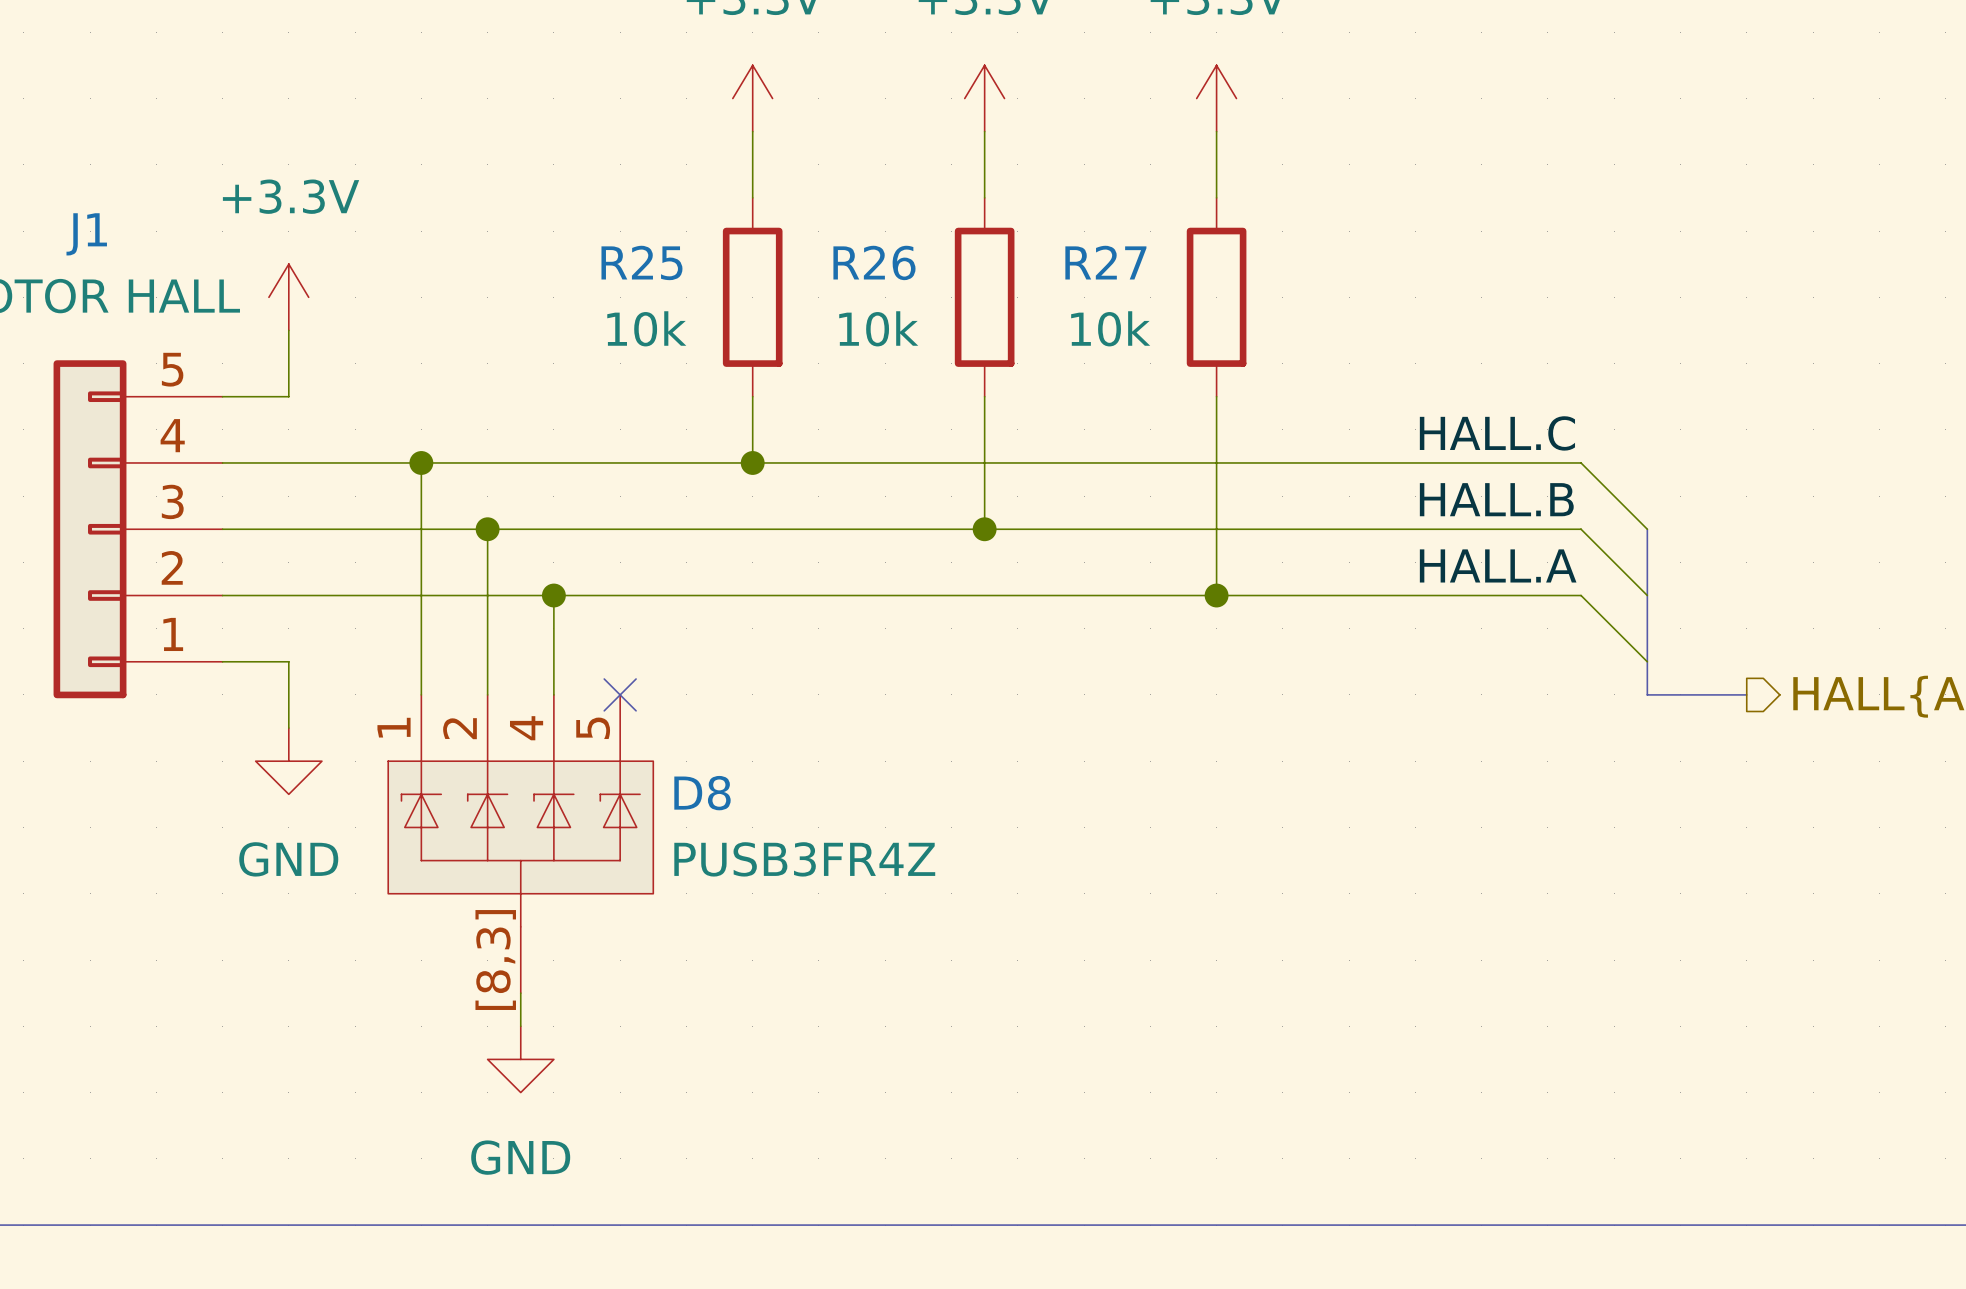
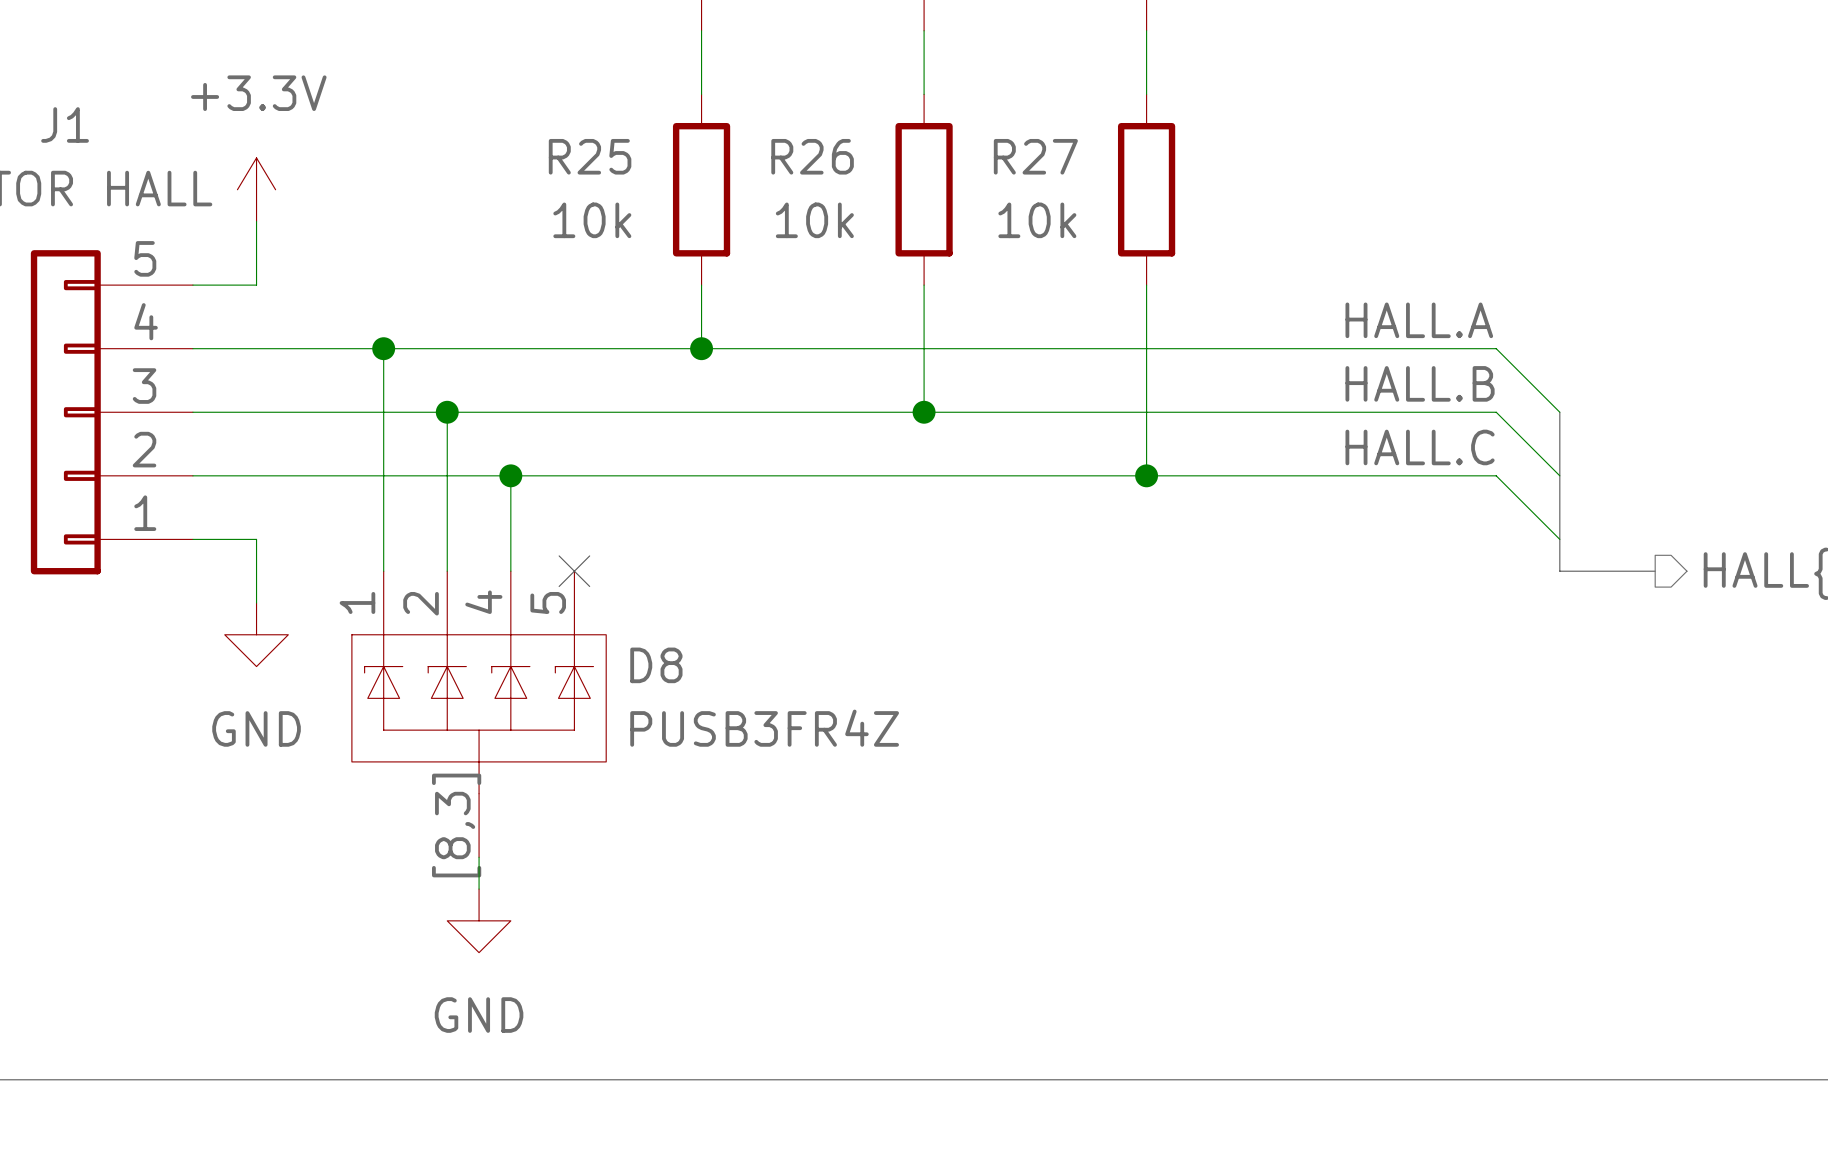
label: HALL.C (1497, 433) -> HALL.A (1419, 320)
label: HALL.A (1498, 565) -> HALL.C (1420, 447)

